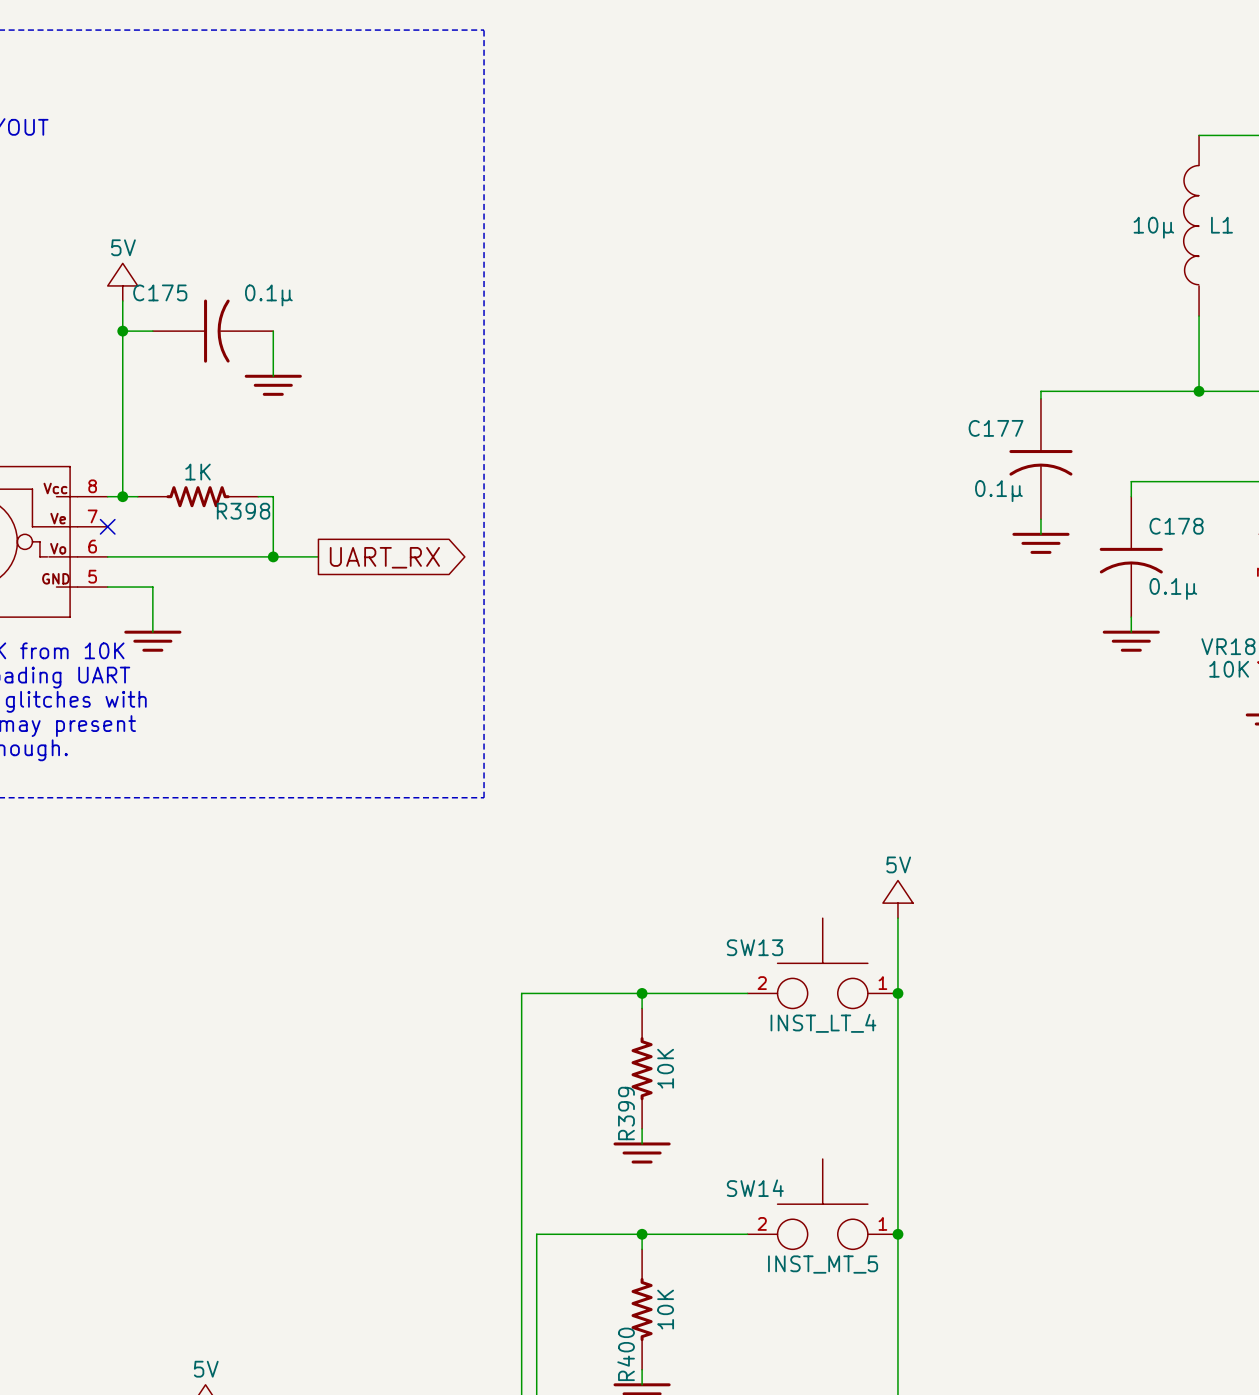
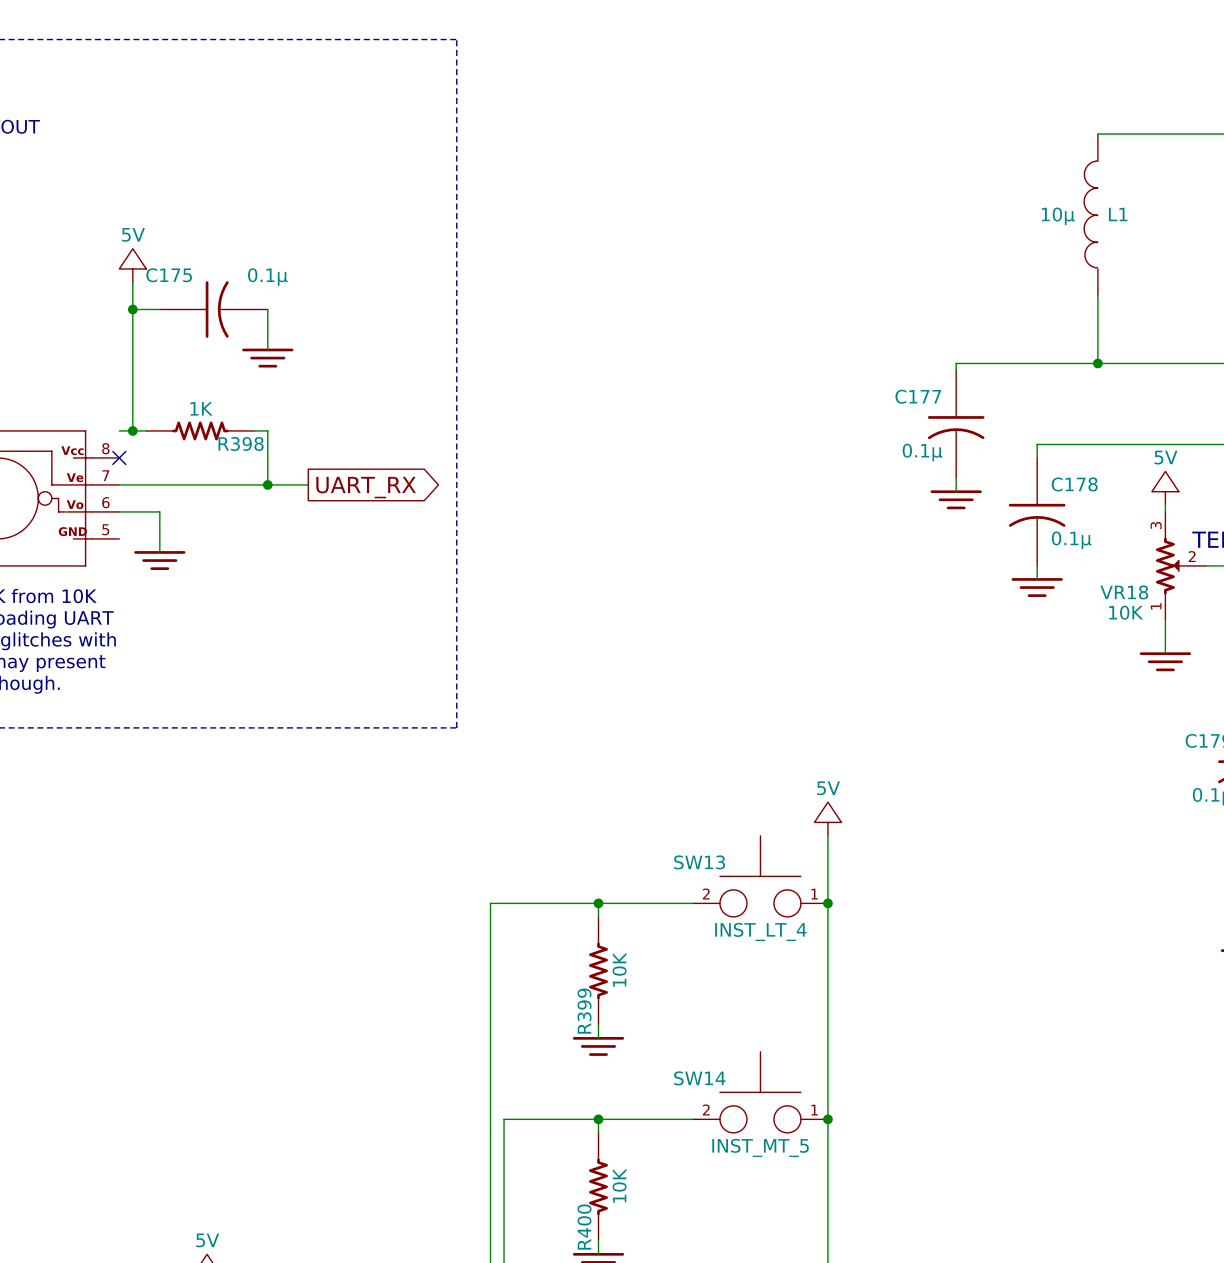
wire: (122, 466) (122, 496) -> none
wire: (107, 496) (137, 496) -> (119, 430) (146, 430)
junction position: (122, 496) -> (132, 430)
R398 position: (198, 496) -> (200, 430)
wire: (258, 496) (273, 496) -> (254, 430) (267, 430) (267, 457)
wire: none -> (119, 484) (308, 484)
no-connect mark position: (107, 526) -> (119, 457)
wire: (273, 526) (273, 556) -> none
wire: (152, 556) (318, 556) -> none
junction position: (273, 556) -> (267, 484)
global label position: UART_RX (384, 557) -> UART_RX (366, 487)
wire: (107, 587) (152, 587) -> (159, 511) (159, 538)
wire: (152, 602) (152, 632) -> none
power symbol position: (152, 641) -> (159, 560)

